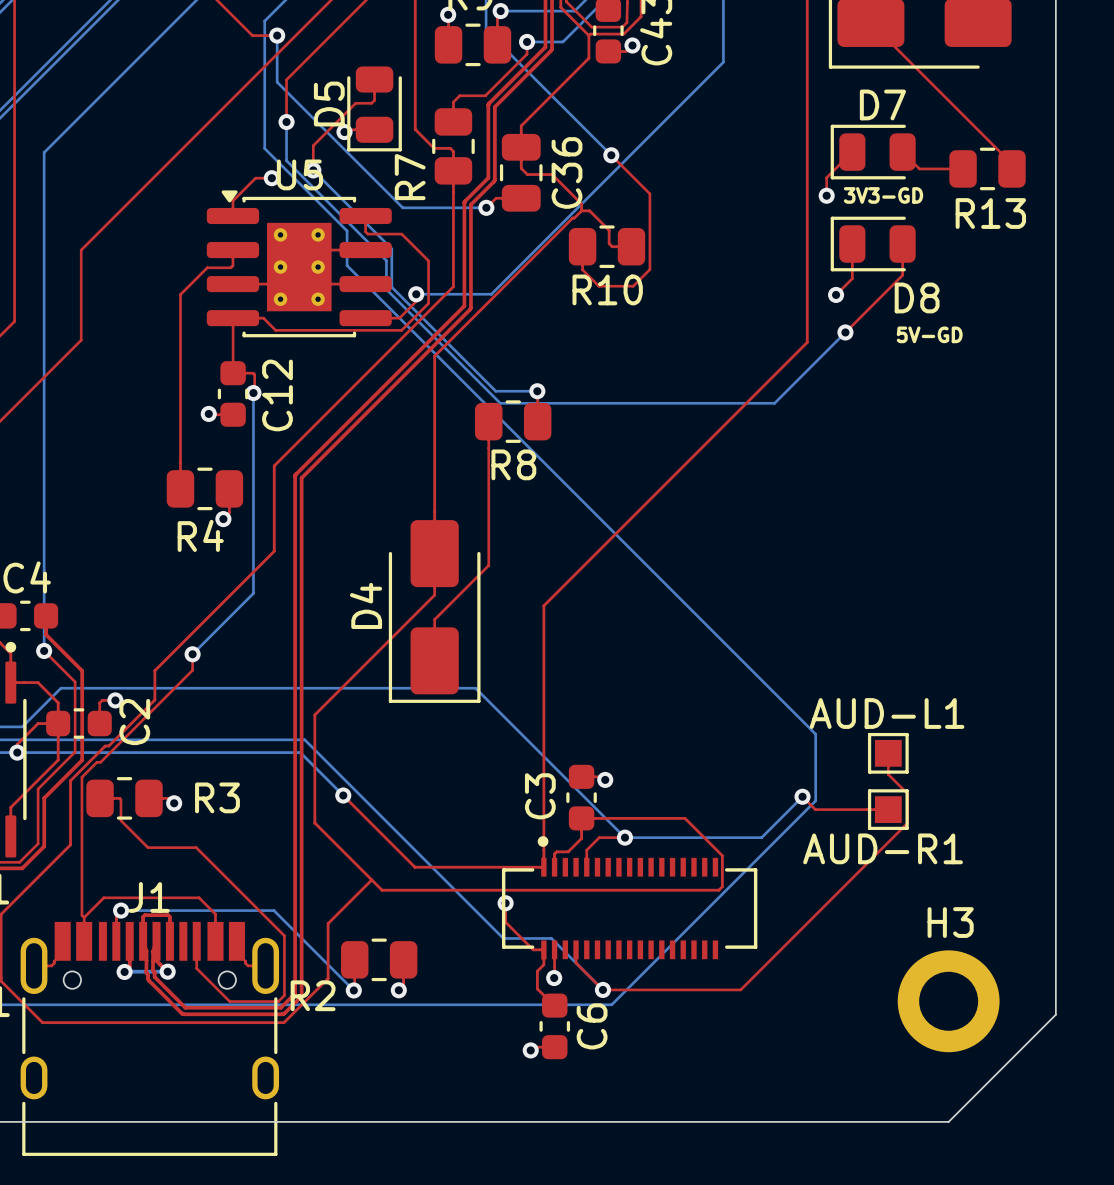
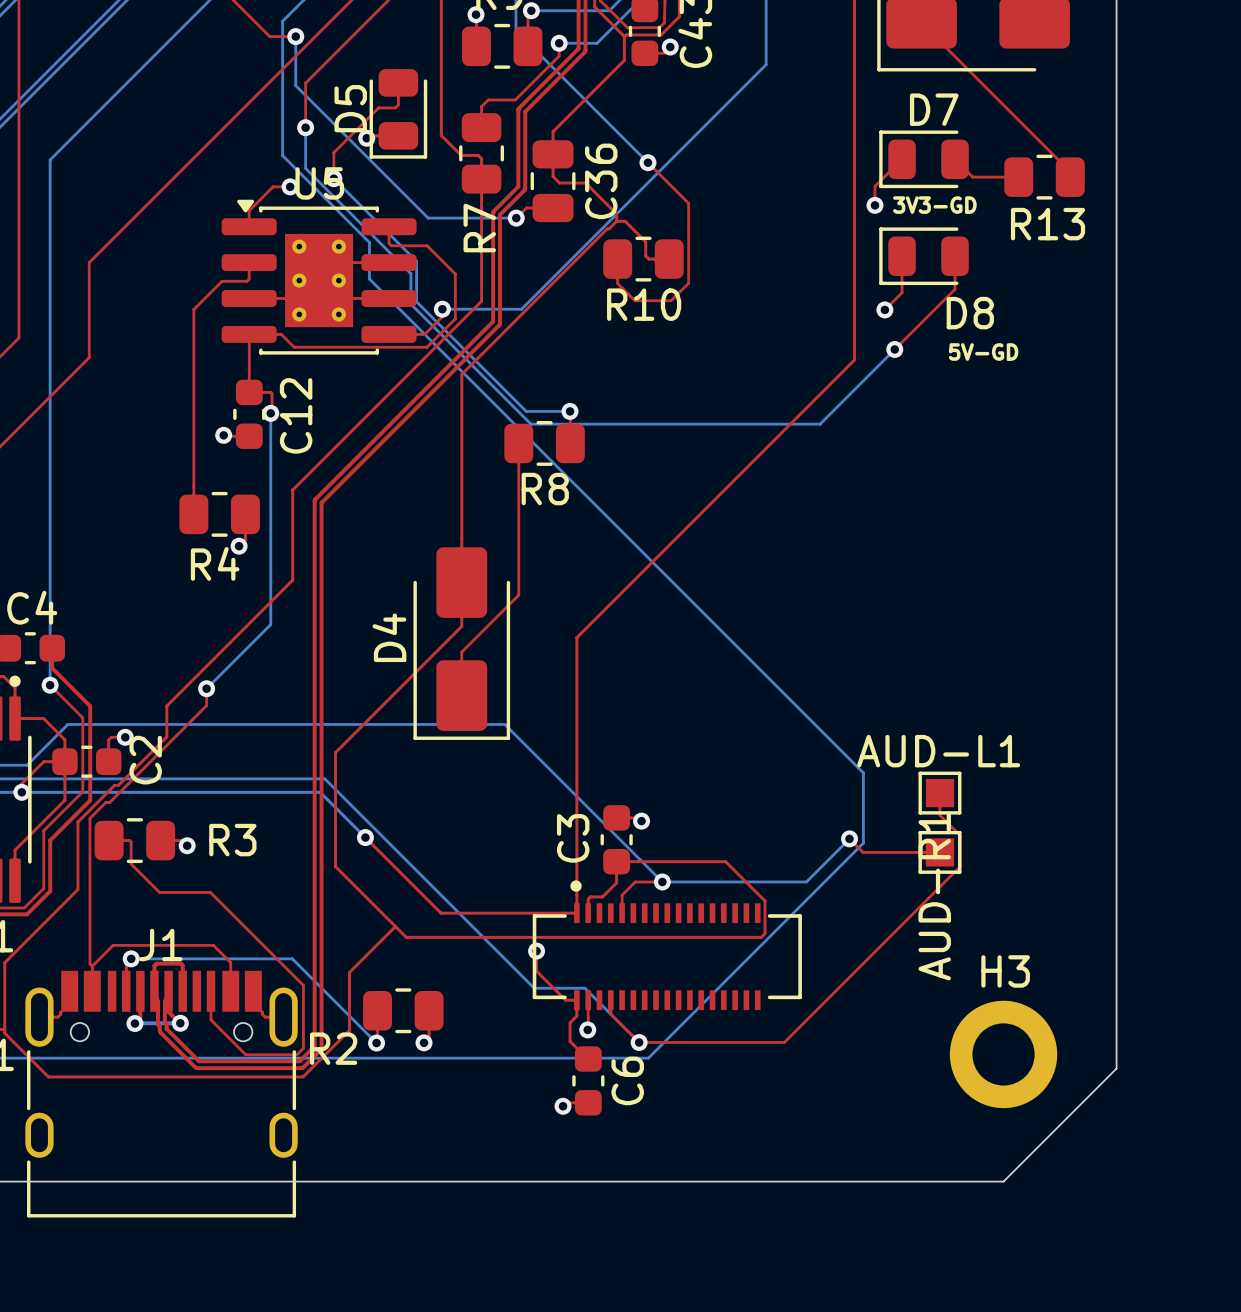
R7 name position: R7 (410, 177) -> R7 (479, 228)
AUD-R1 name rotation: 0° (883, 848) -> 90° counterclockwise (934, 896)

